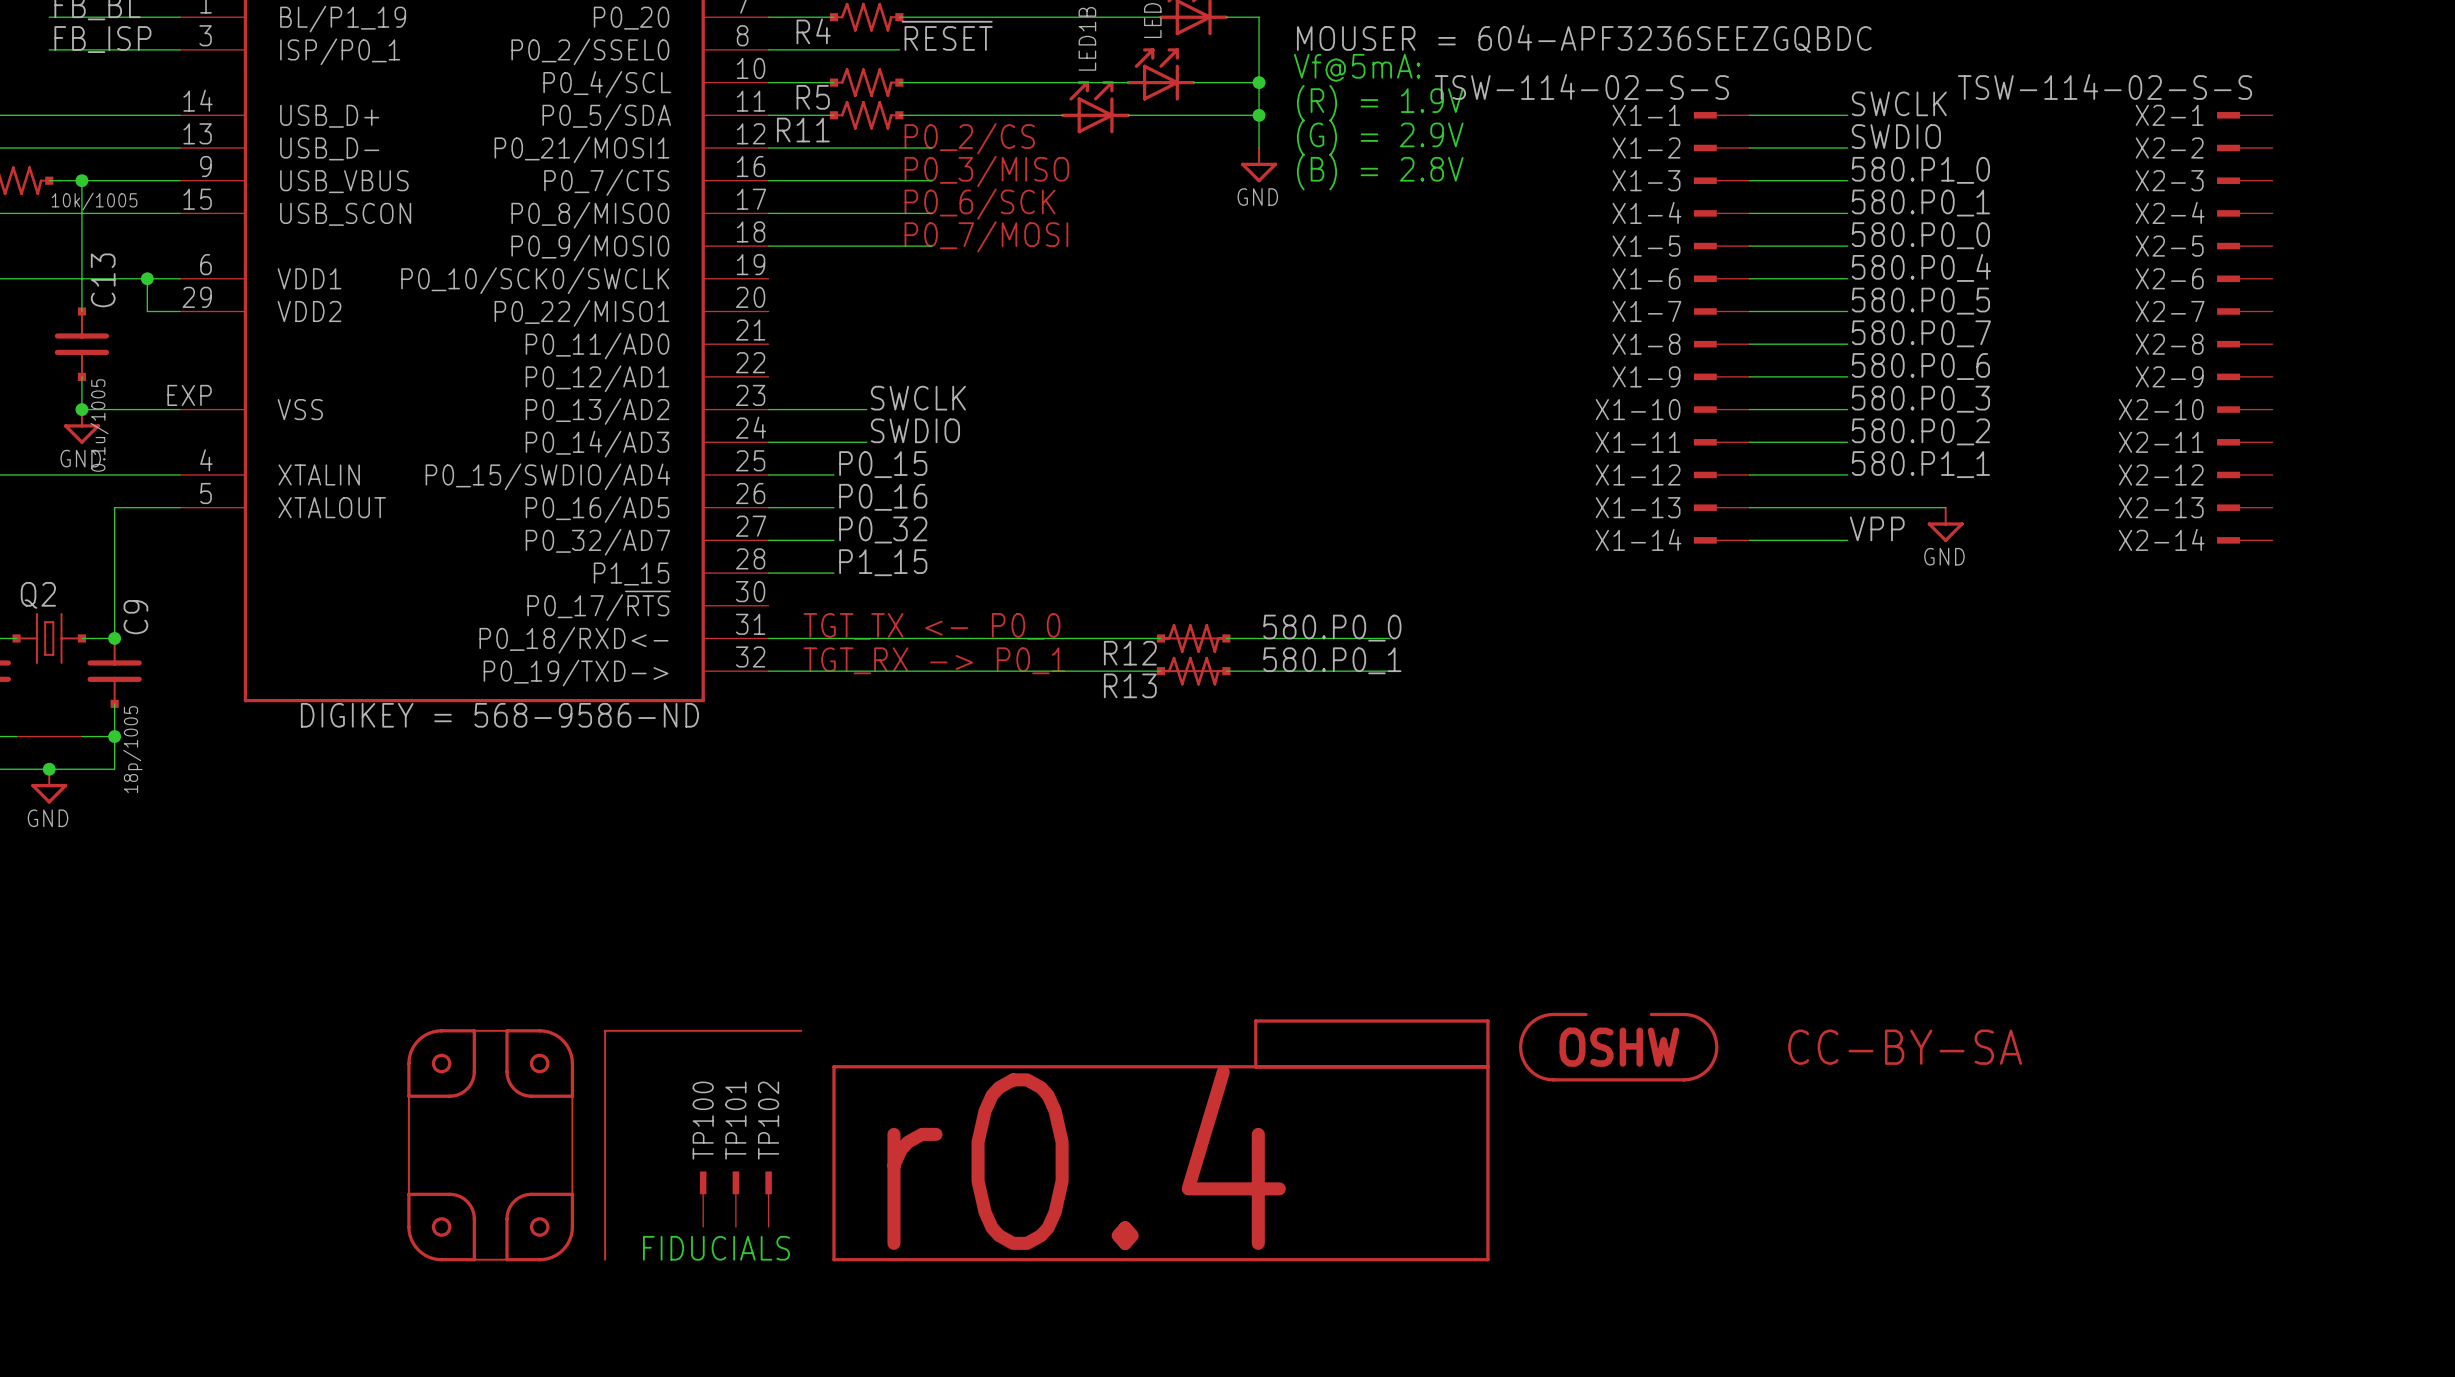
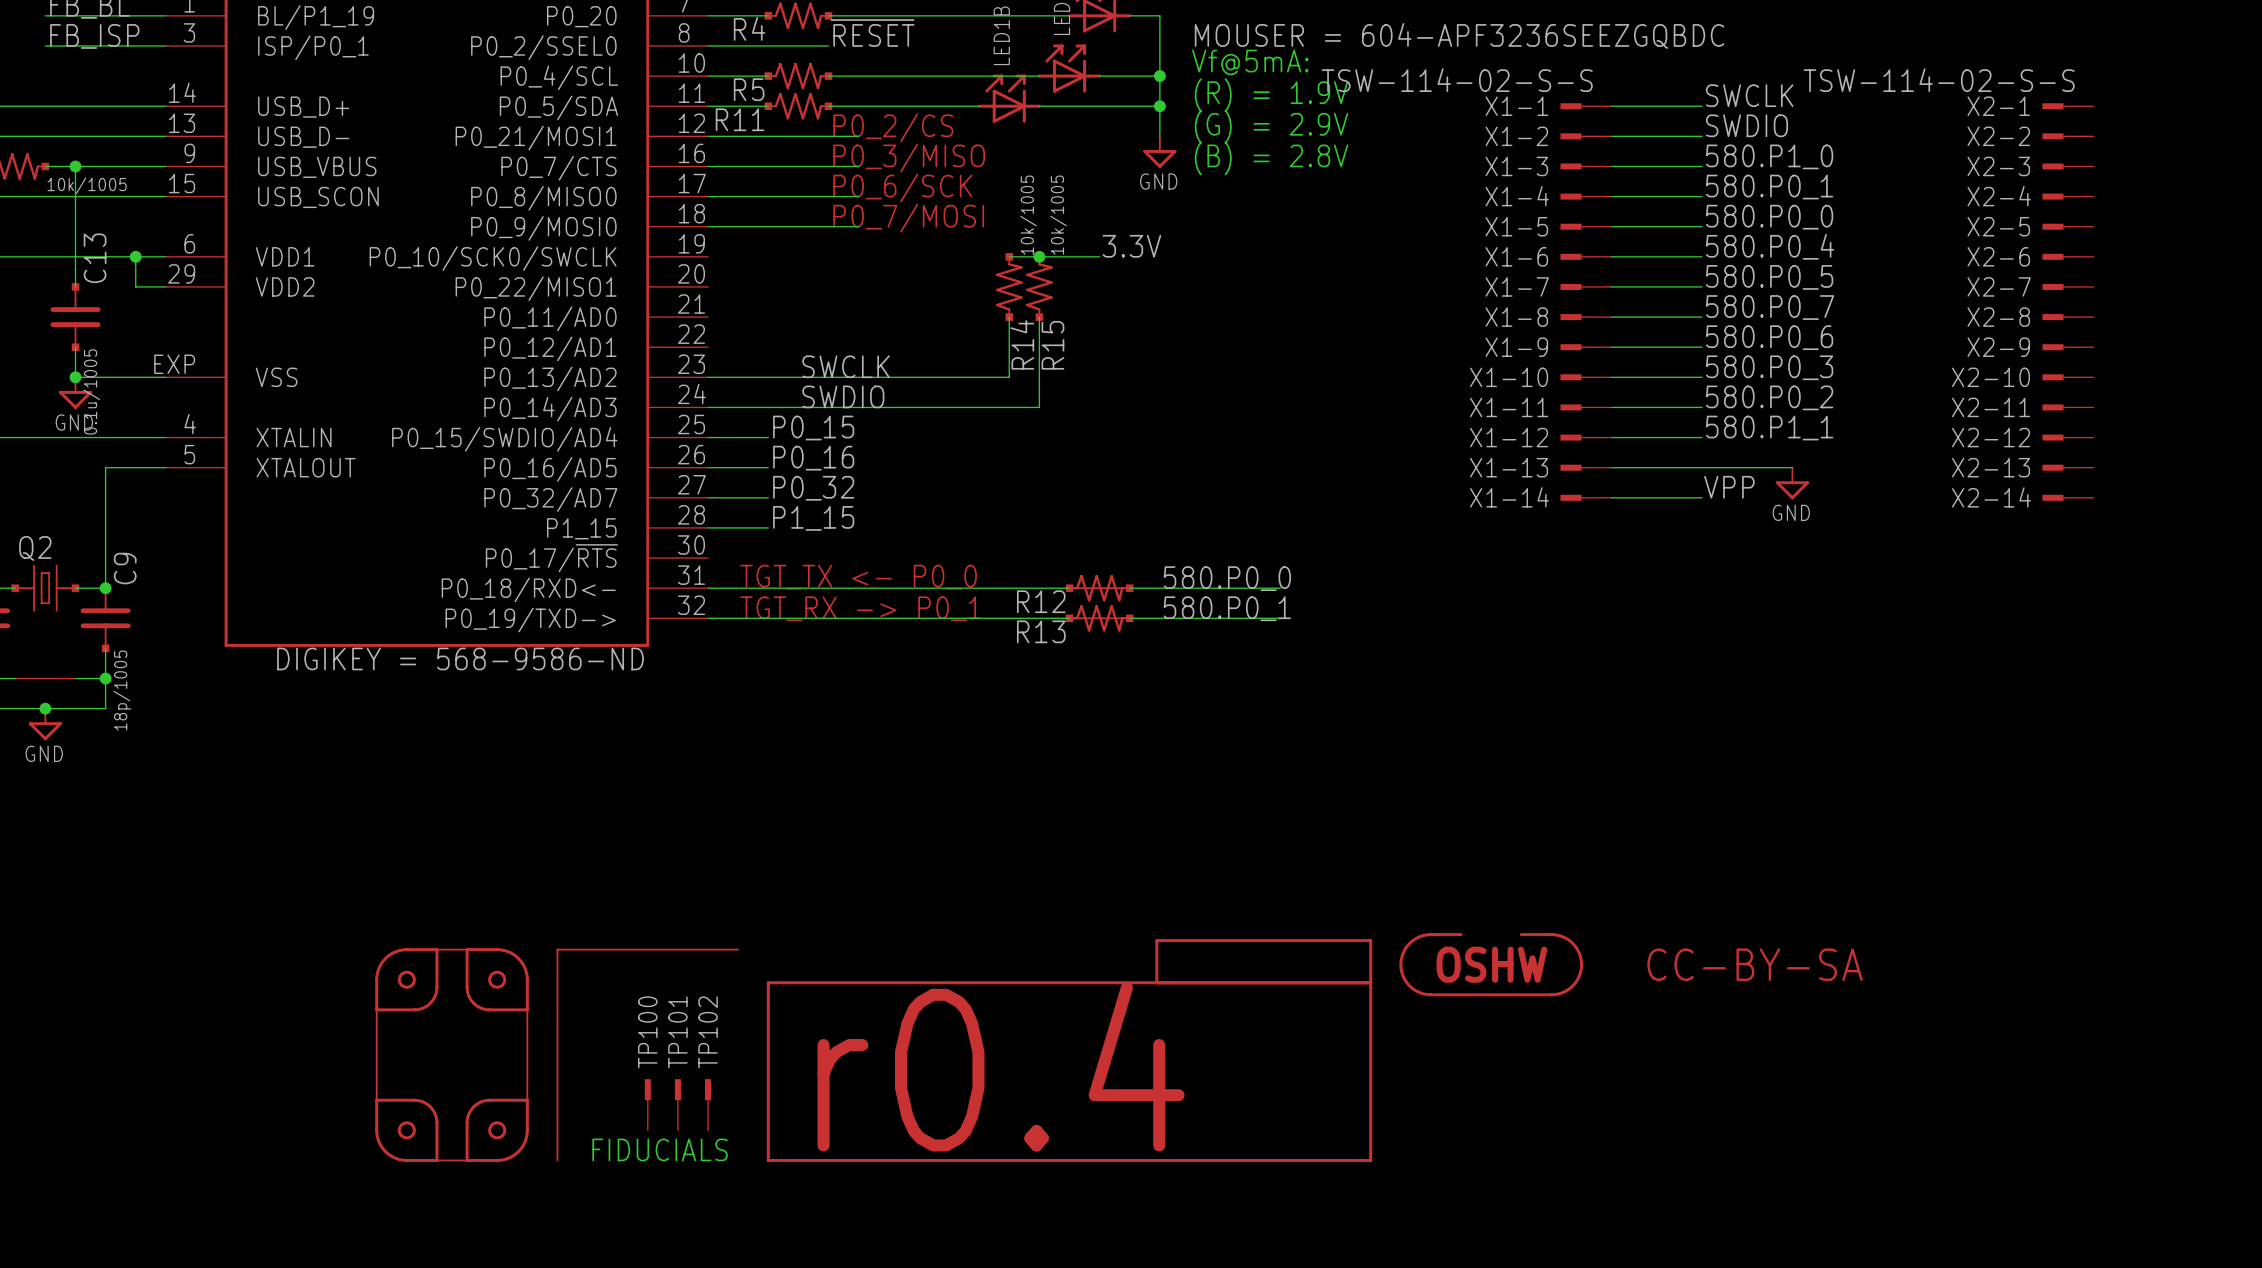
label: none -> 3.3V (1131, 246)
wire: none -> (1009, 256) (1099, 256)
junction: none -> (1039, 256)
R14: none -> 10k/1005 (1009, 286)
R15: none -> 10k/1005 (1039, 286)
wire: none -> (1009, 317) (1009, 377) (798, 377)
wire: none -> (1039, 317) (1039, 407) (798, 407)

